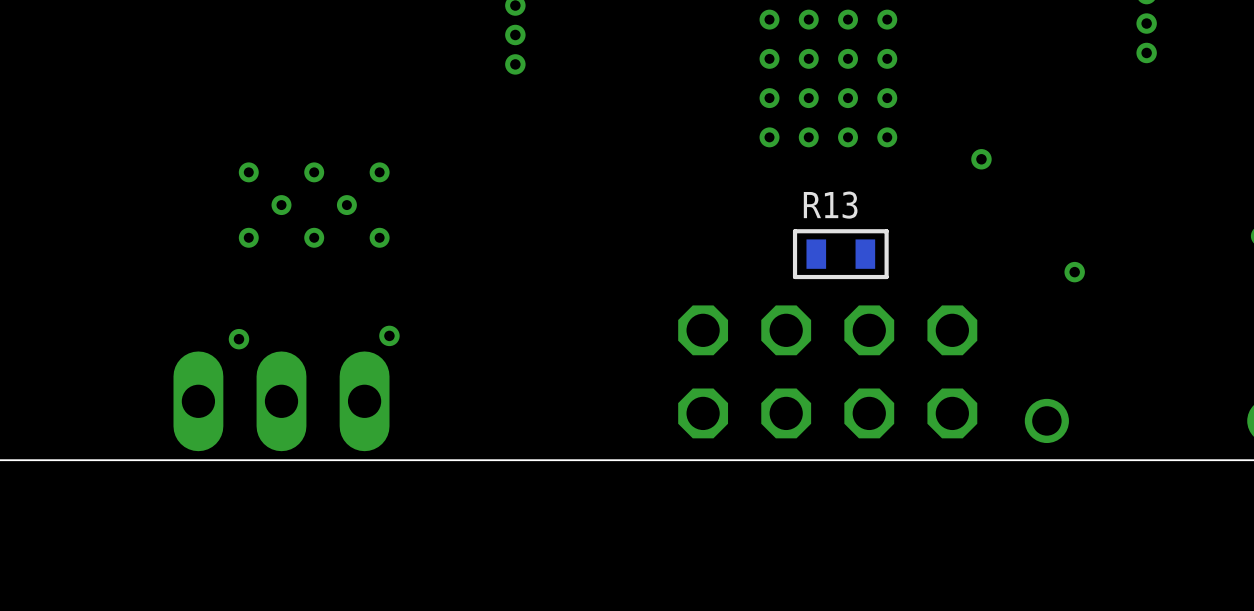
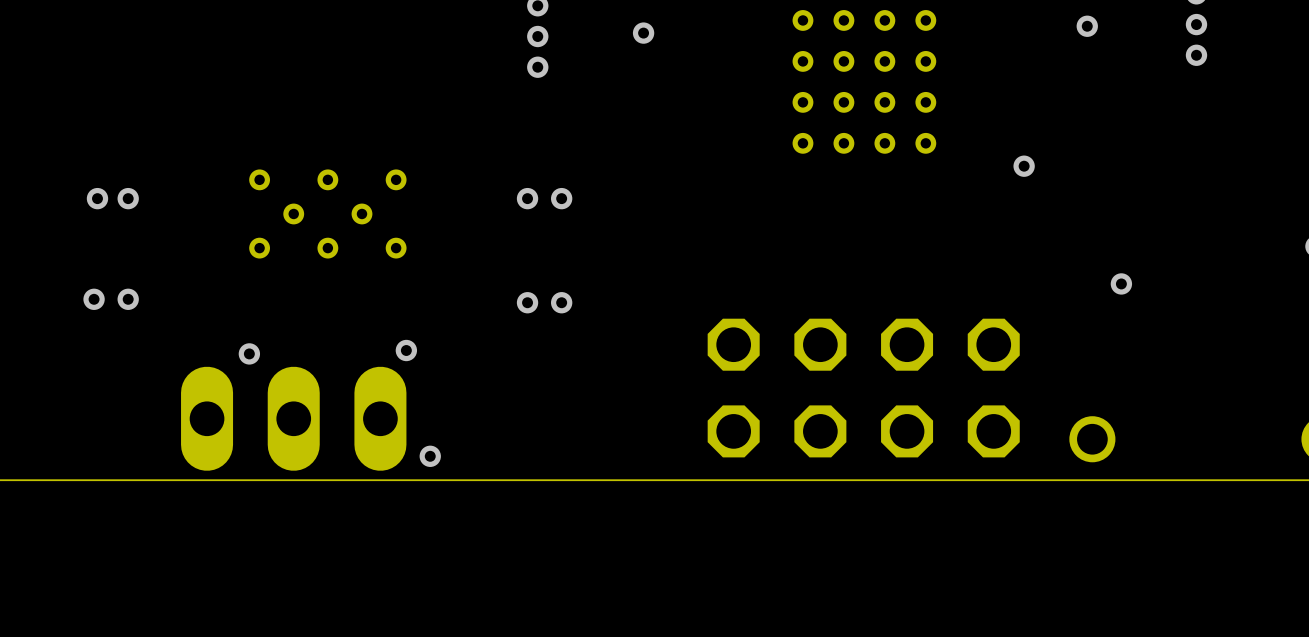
via: none -> (1087, 26)
via: none -> (643, 33)
via: none -> (97, 198)
via: none -> (128, 198)
via: none -> (527, 198)
via: none -> (561, 198)
R13: (840, 254) -> none
via: none -> (94, 299)
via: none -> (128, 299)
via: none -> (527, 302)
via: none -> (561, 302)
via: none -> (430, 456)

